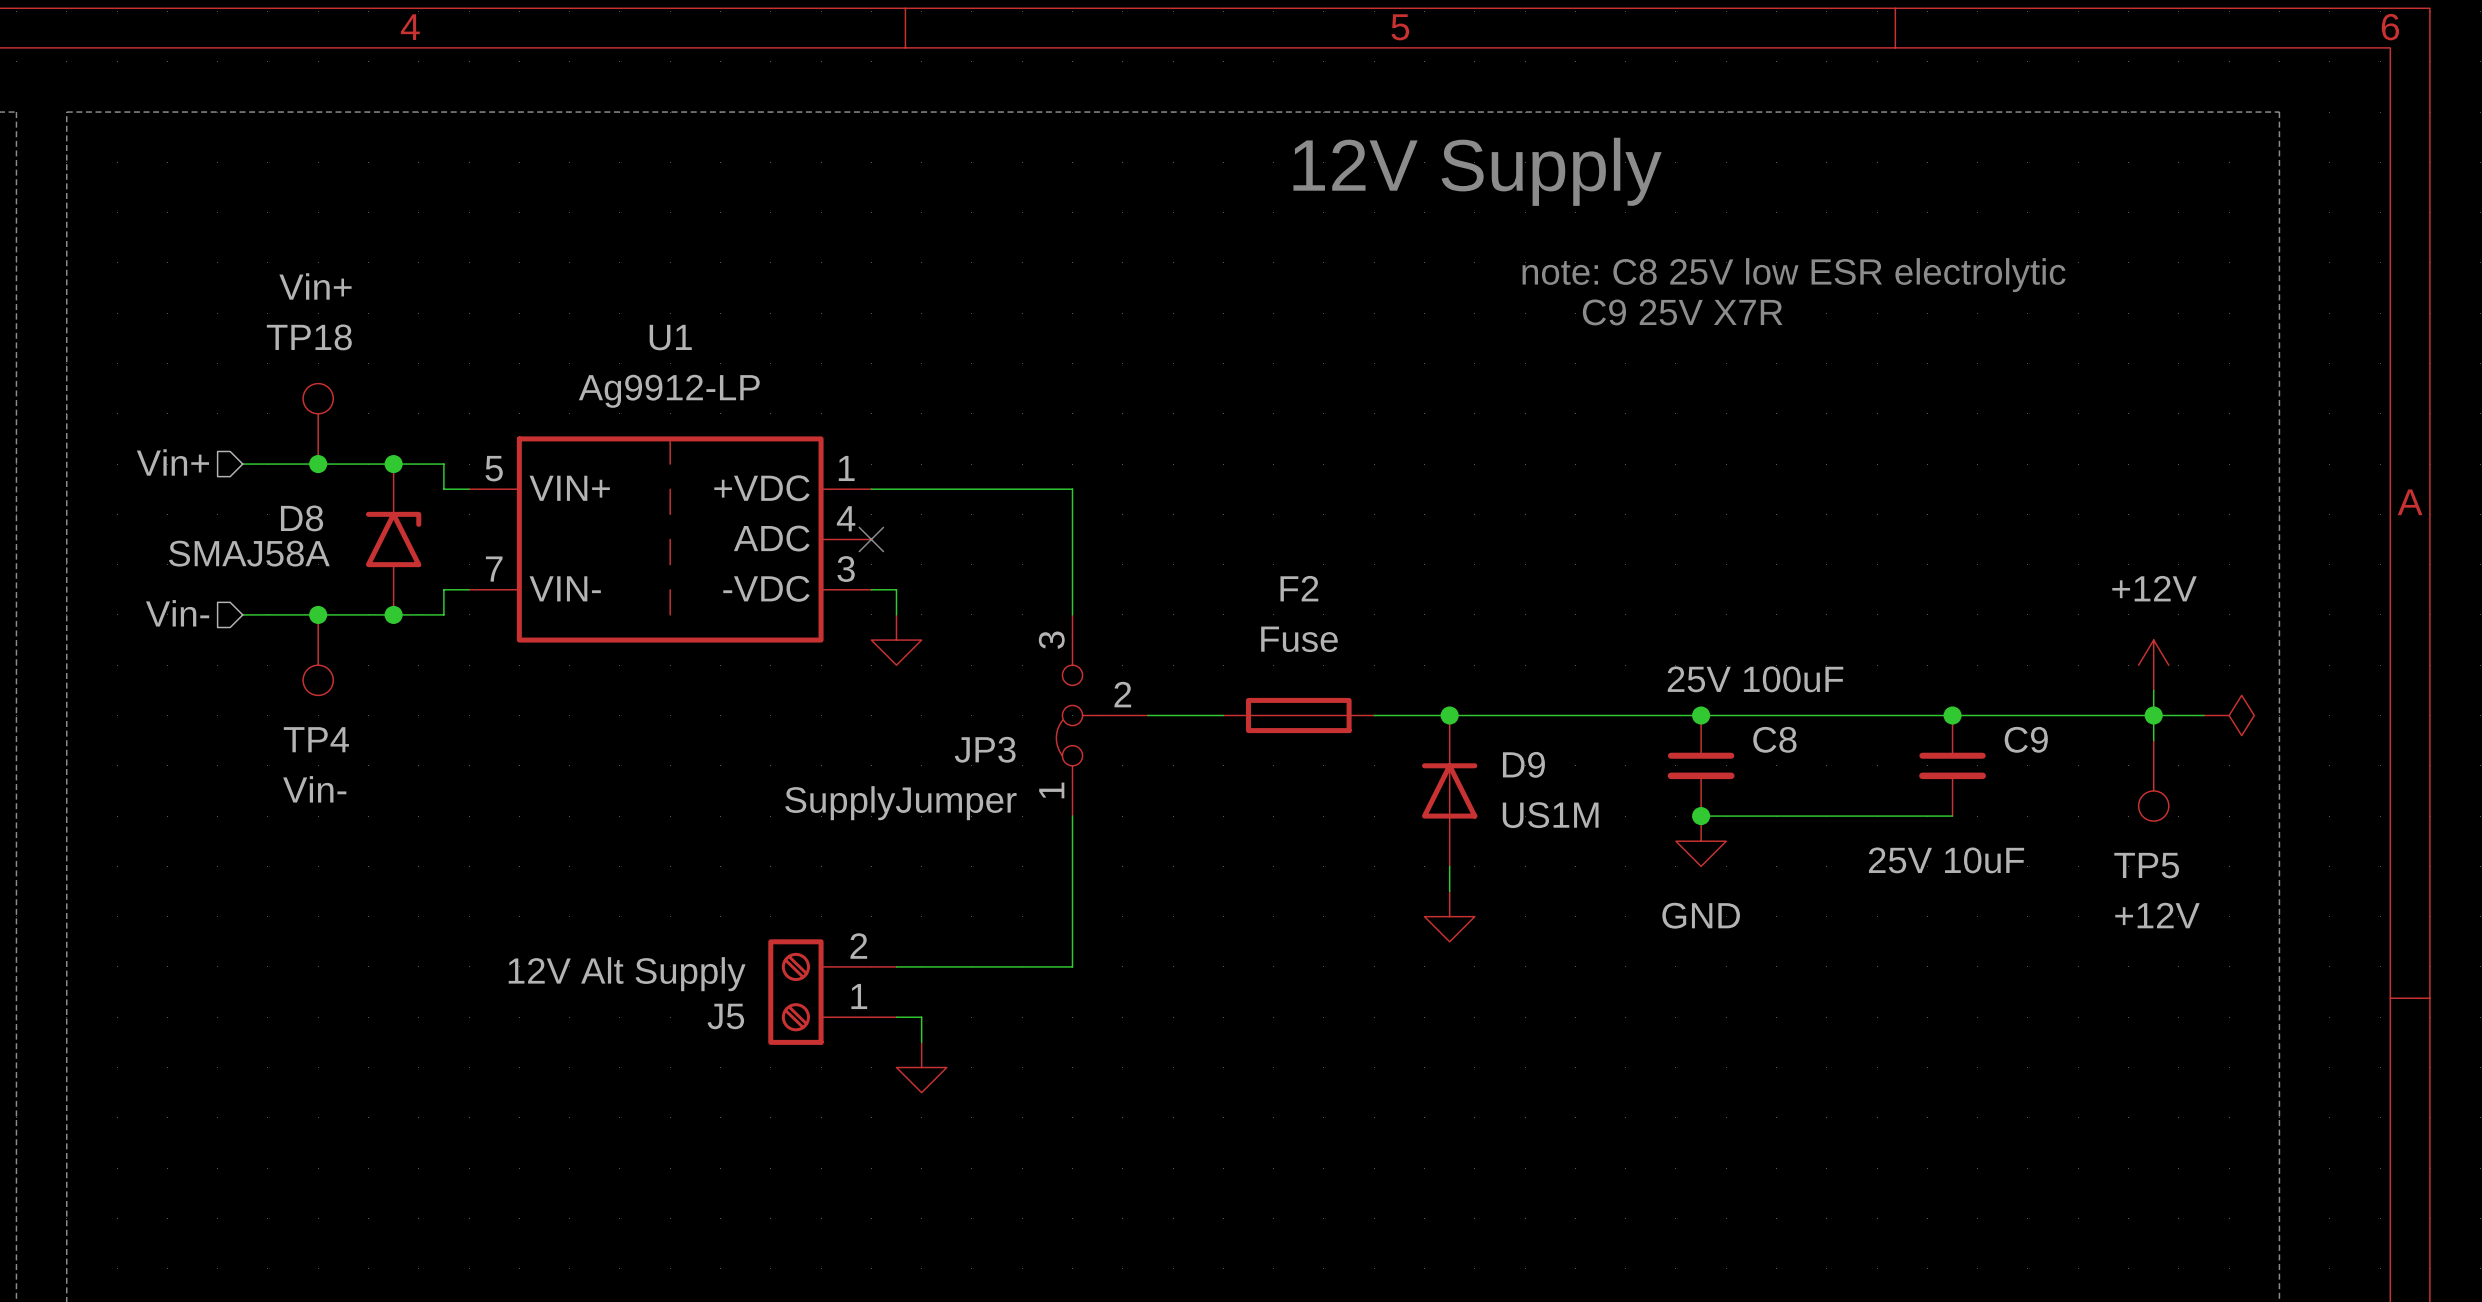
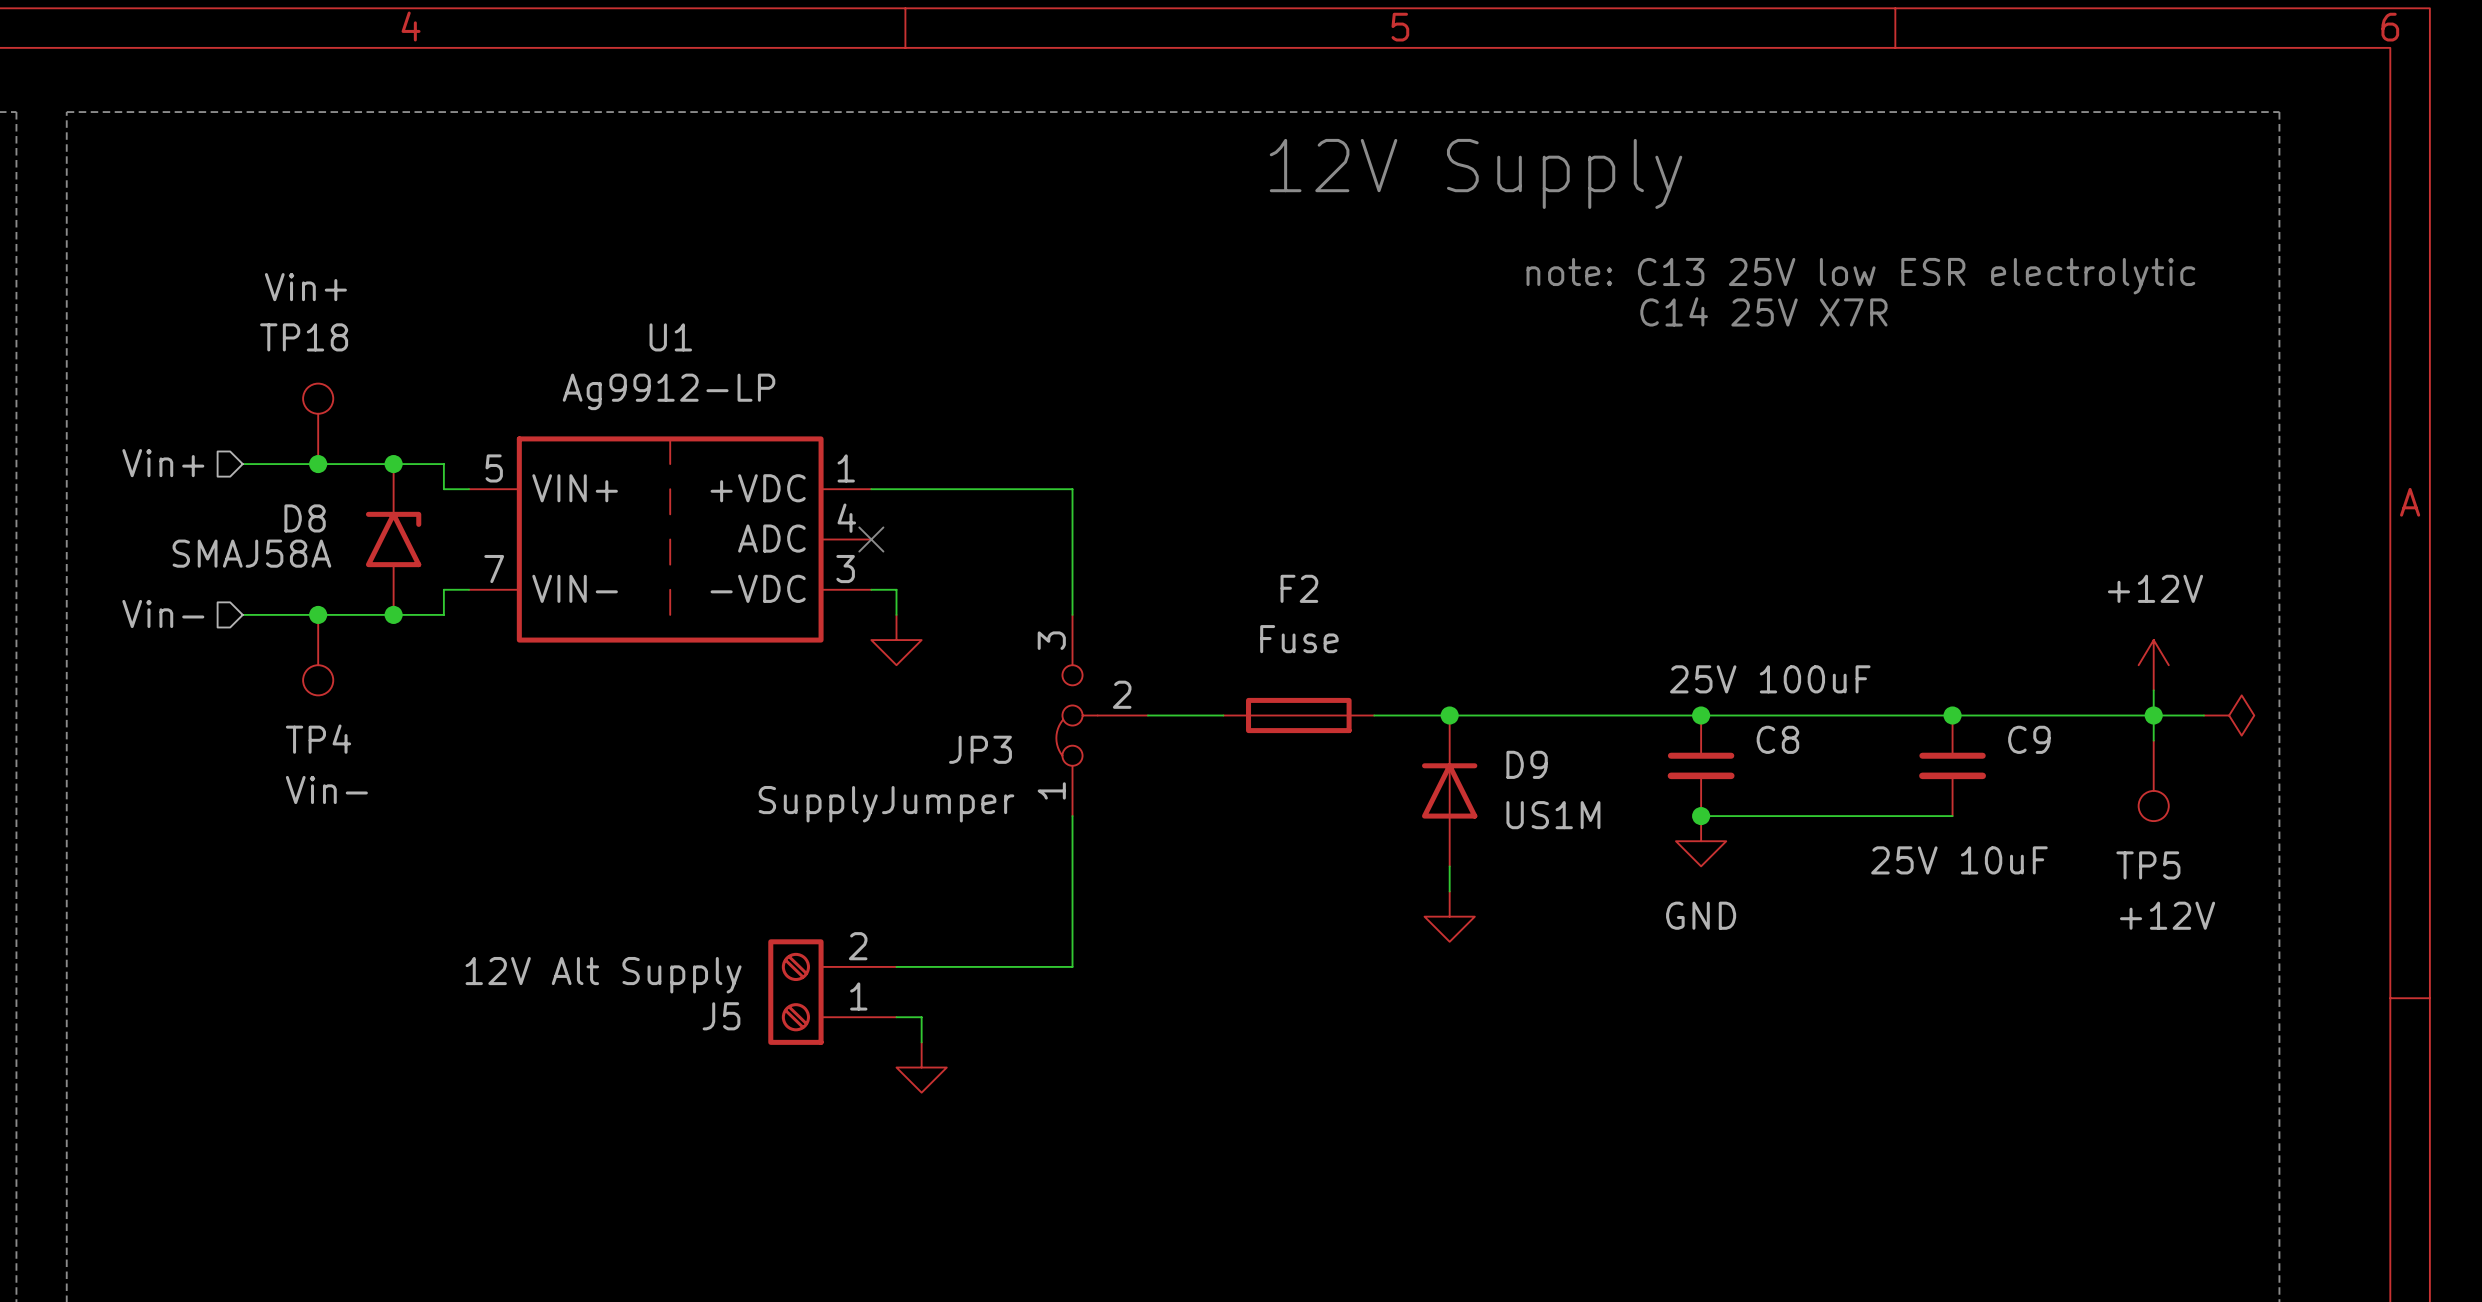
text: note: C8 25V low ESR electrolytic (1794, 275) -> note: C13 25V low ESR electrolytic (1860, 276)
text: C9 25V X7R (1682, 312) -> C14 25V X7R (1763, 311)

